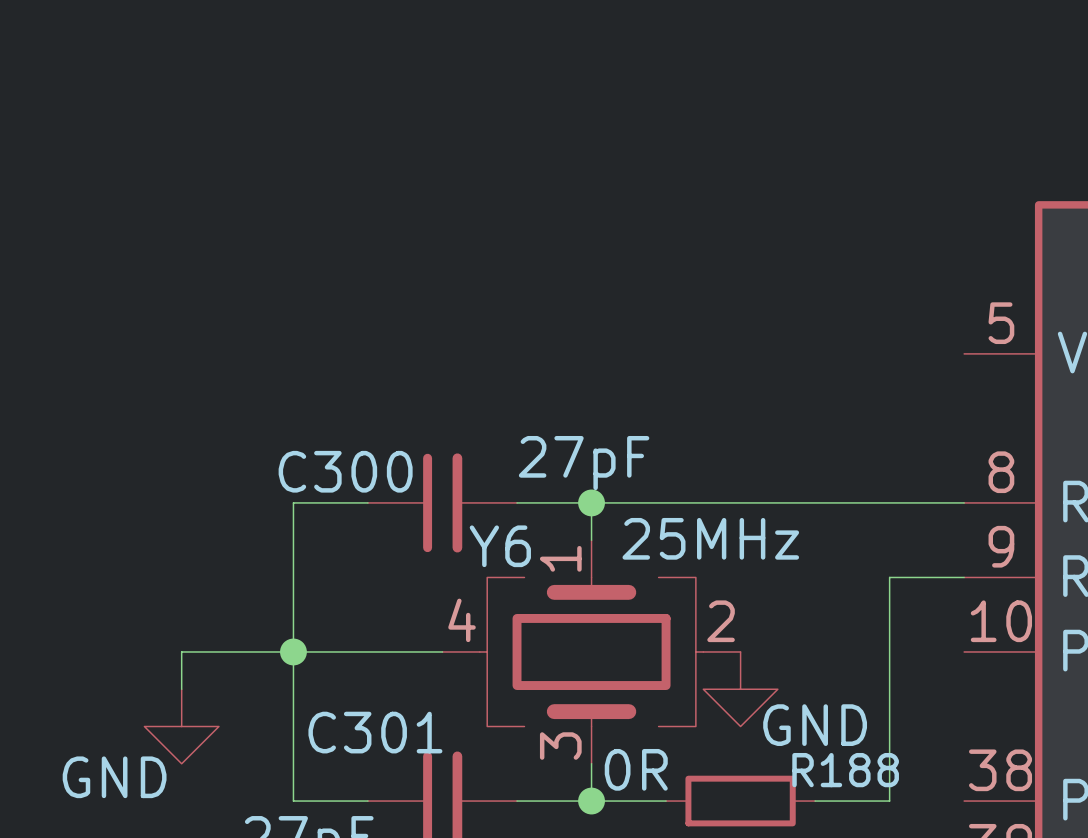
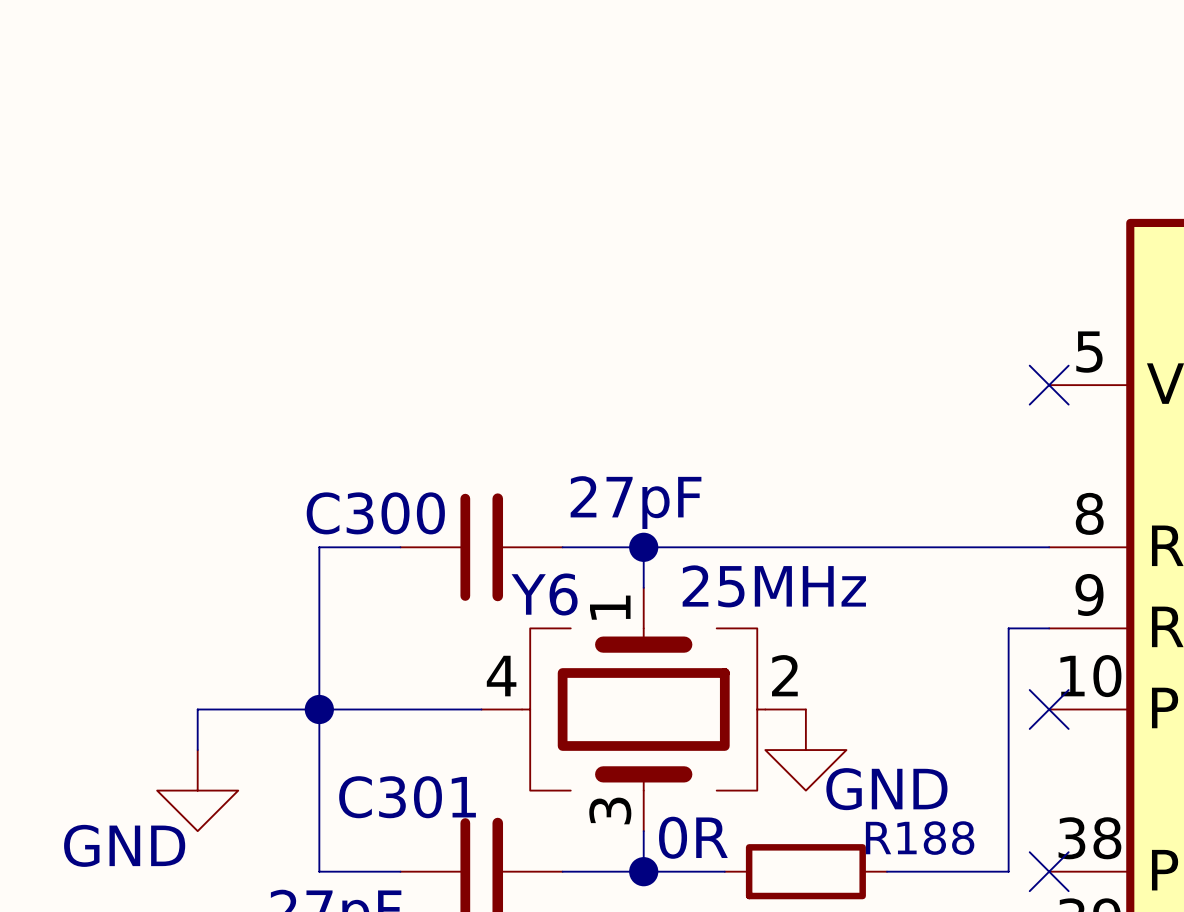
no-connect mark: none -> (1049, 385)
wire: (926, 577) (889, 577) (889, 801) -> (1008, 628) (1008, 871) (968, 871)
no-connect mark: none -> (1049, 709)
no-connect mark: none -> (1049, 871)

